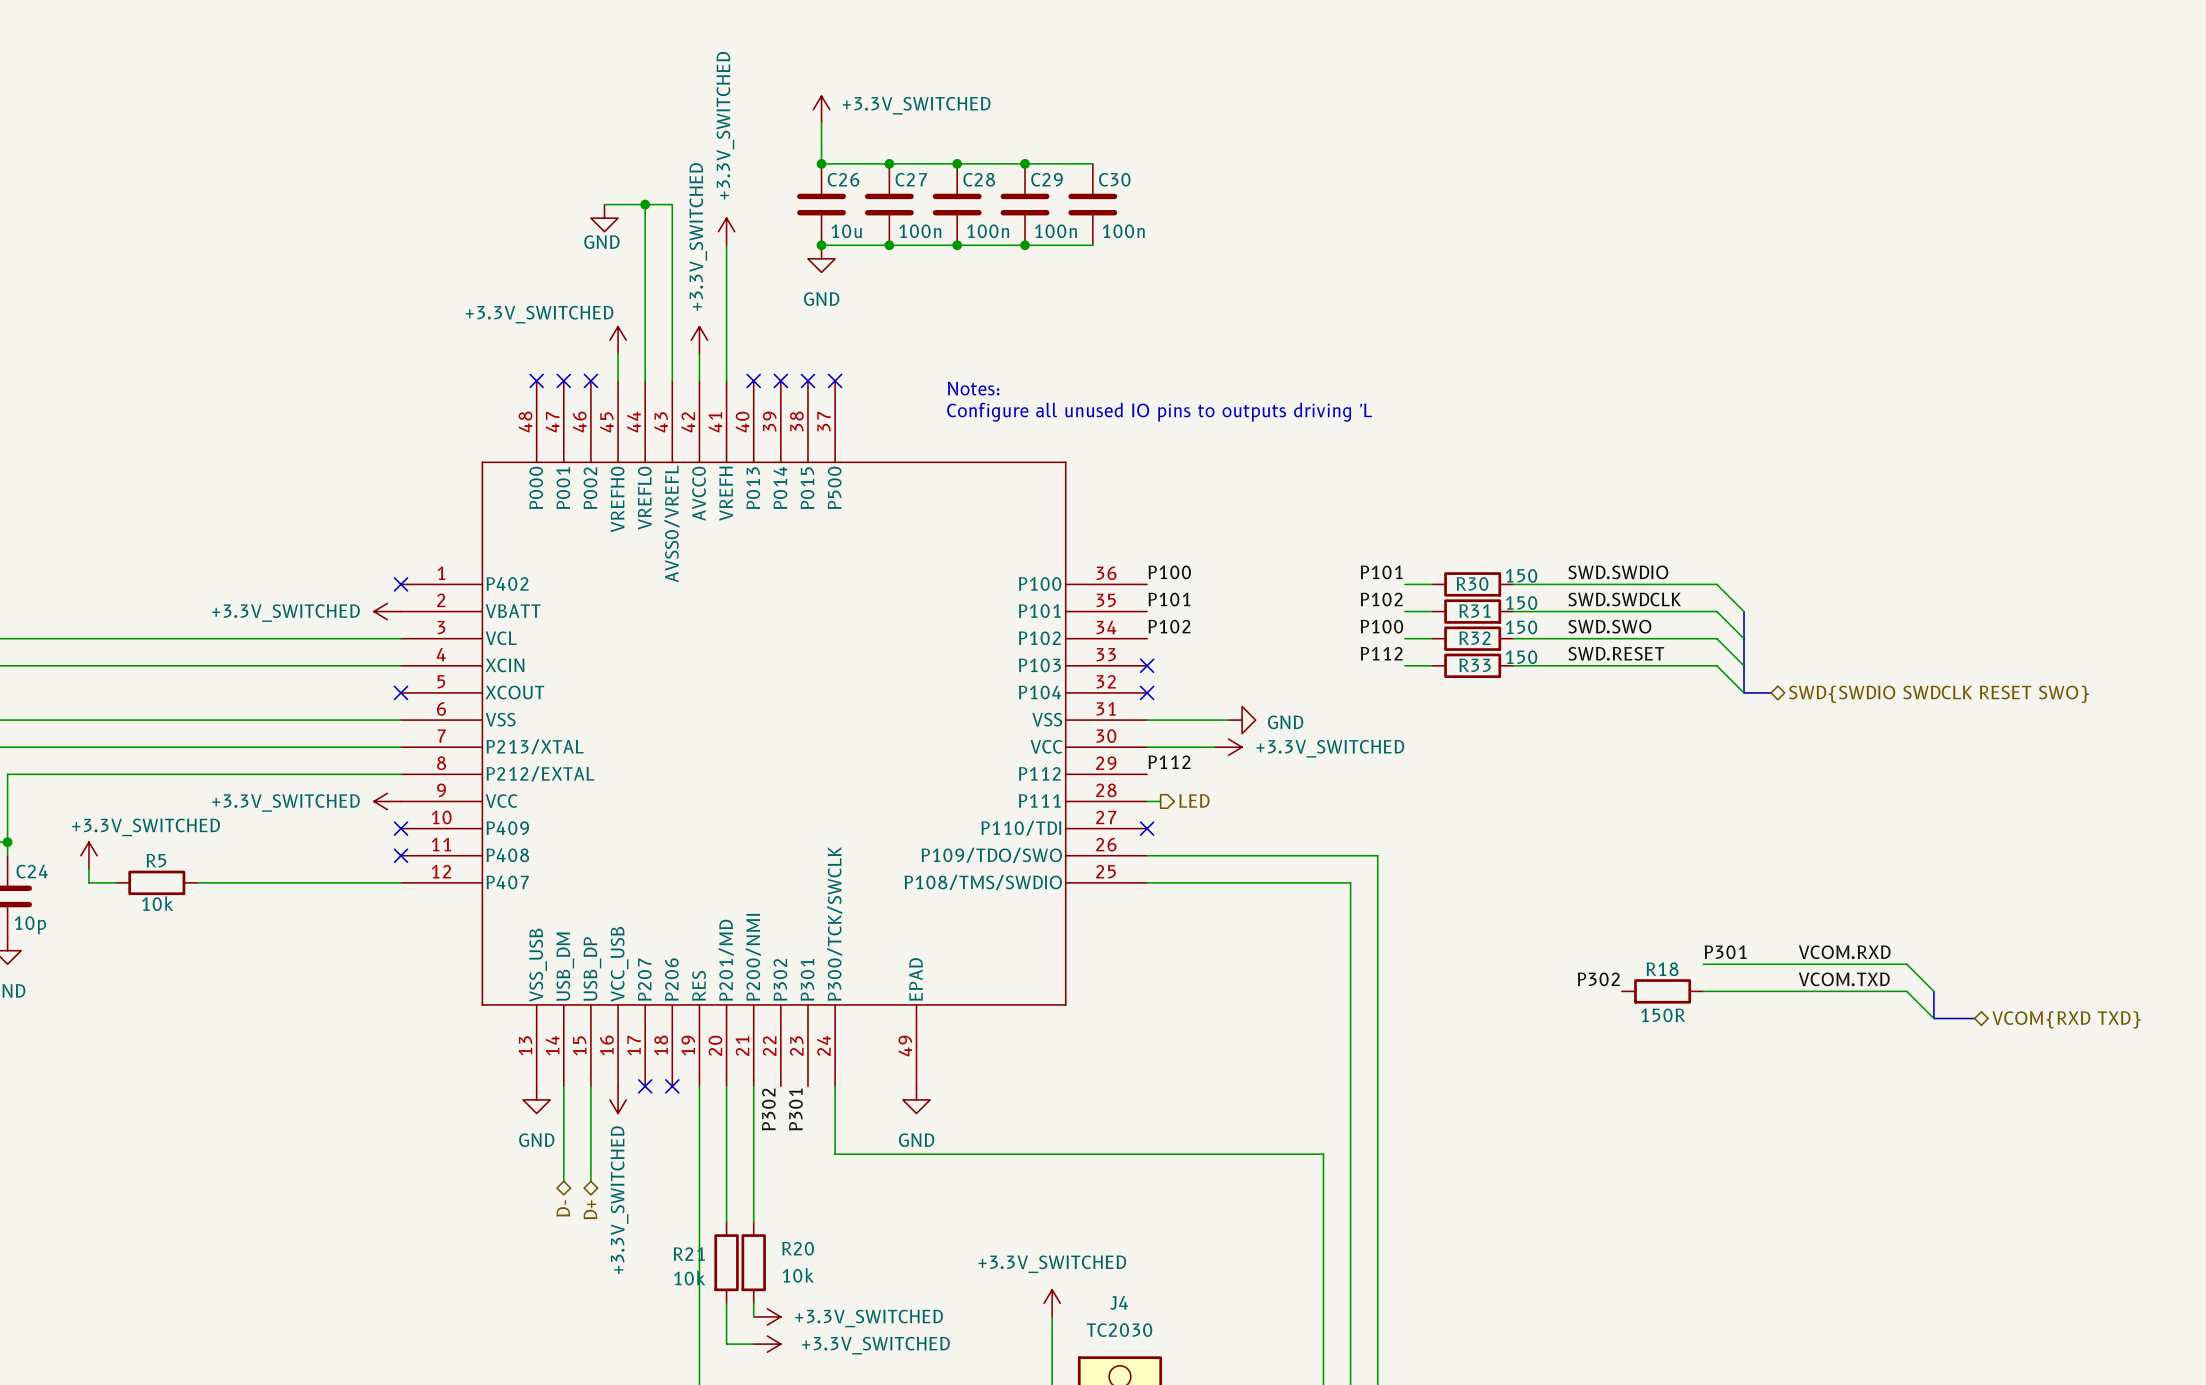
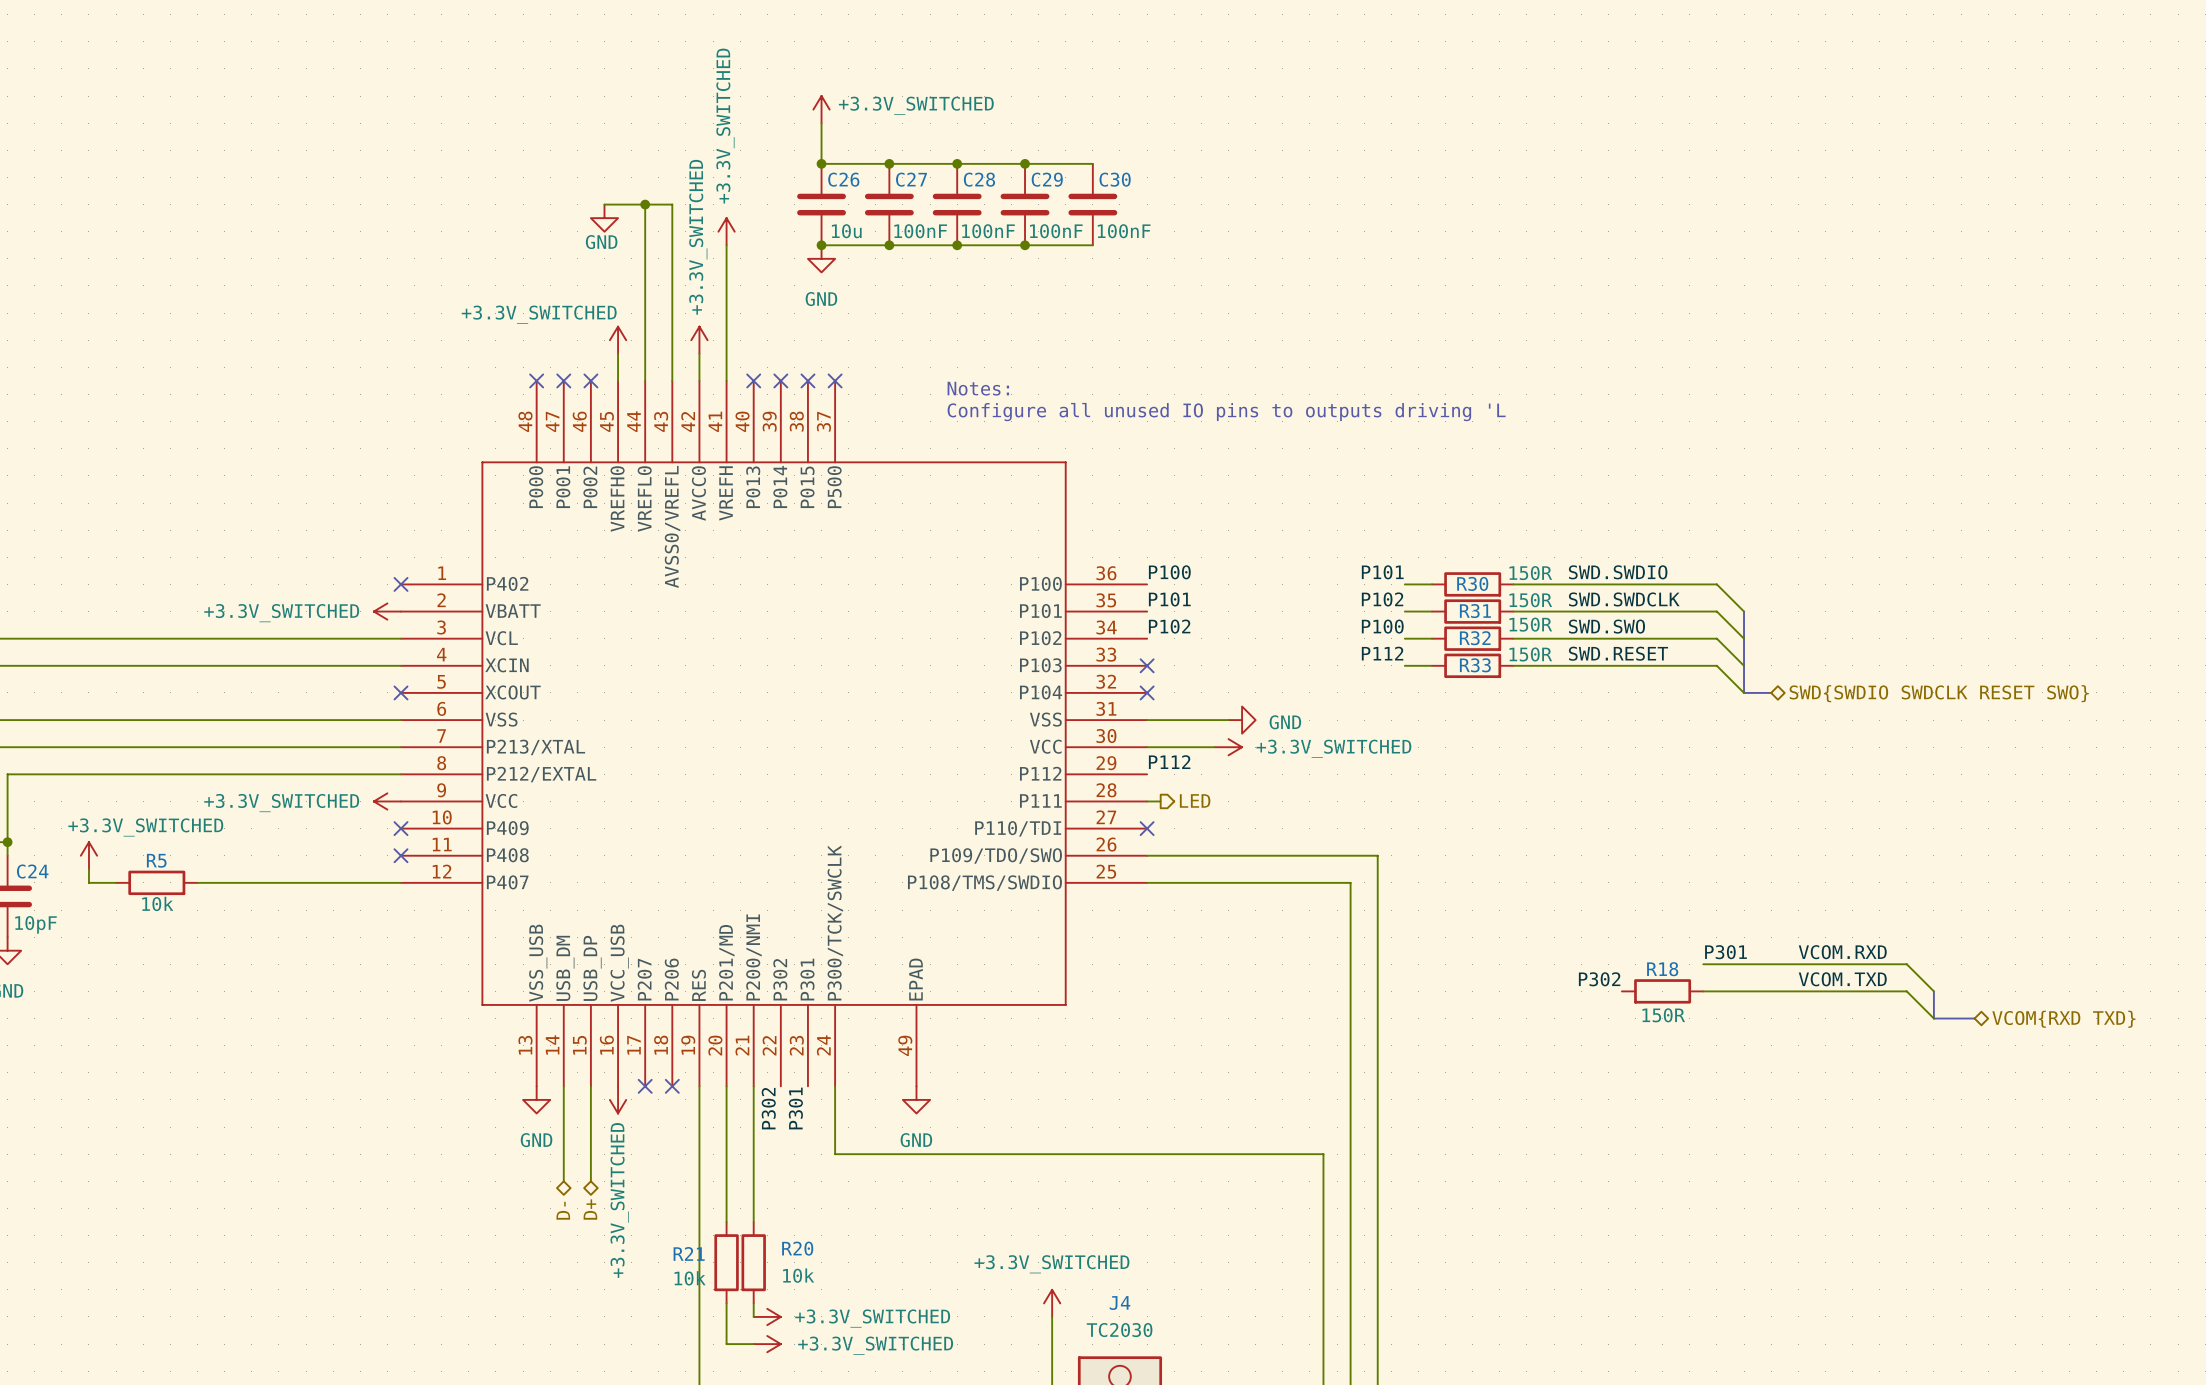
C27 value: 100n (920, 231) -> 100nF (920, 231)
C28 value: 100n (988, 231) -> 100nF (988, 231)
C29 value: 100n (1055, 231) -> 100nF (1056, 231)
C30 value: 100n (1123, 231) -> 100nF (1124, 231)
R30 value: 150 (1521, 575) -> 150R (1530, 573)
R31 value: 150 (1521, 602) -> 150R (1530, 600)
R32 value: 150 (1521, 627) -> 150R (1530, 624)
R33 value: 150 (1521, 657) -> 150R (1530, 654)
C24 value: 10p (30, 925) -> 10pF (35, 924)

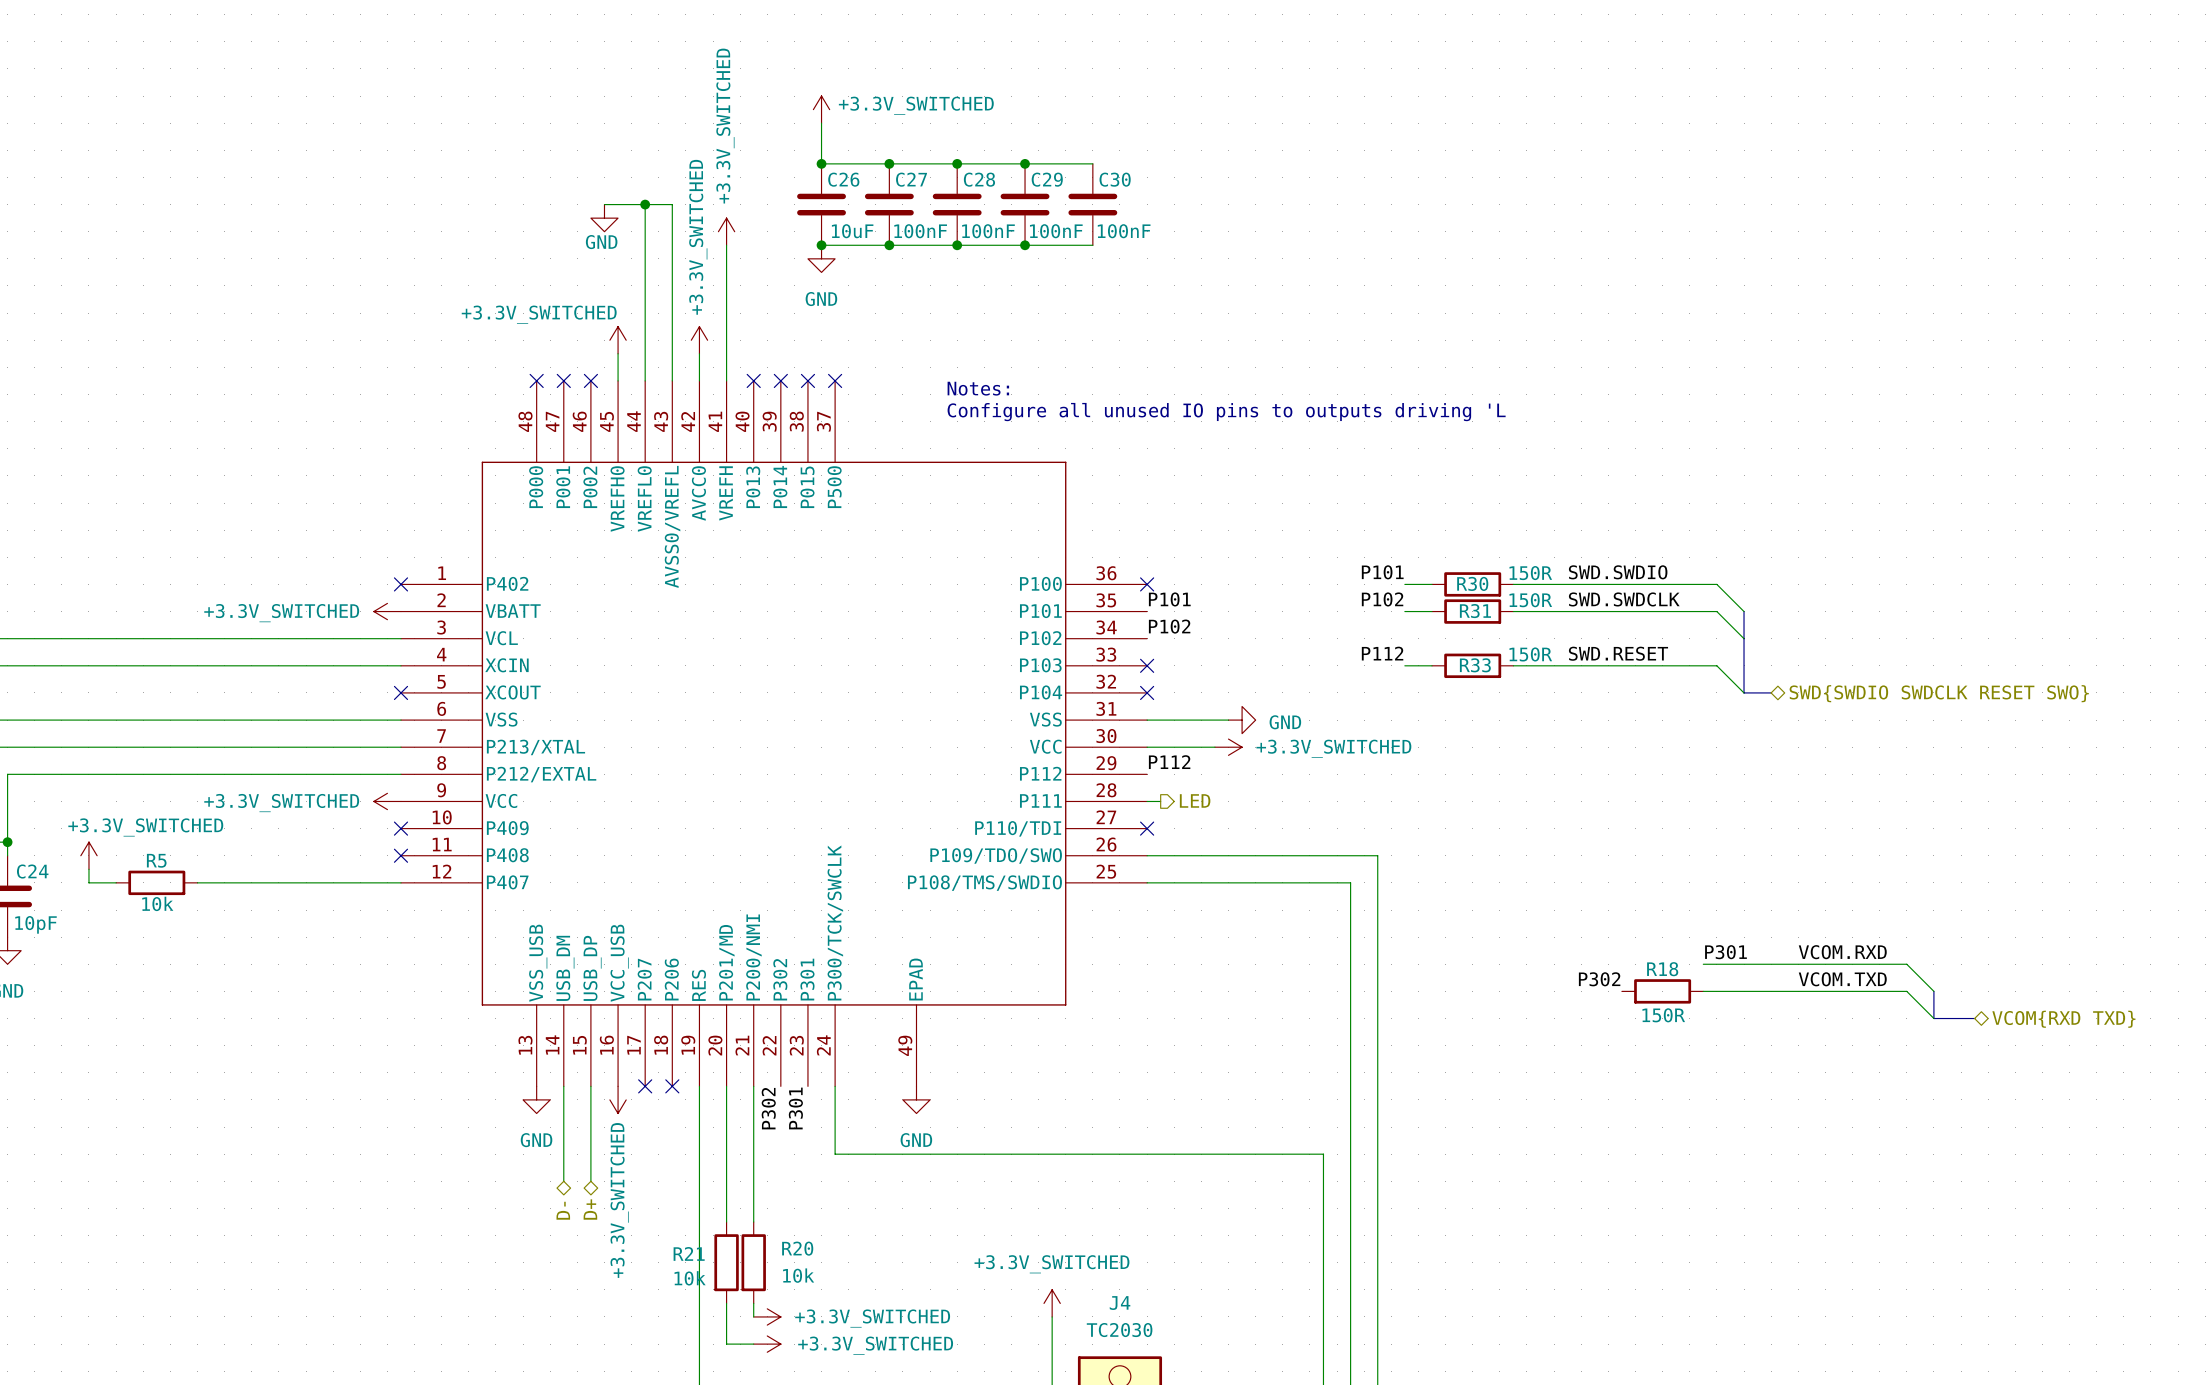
C26 value: 10u (846, 231) -> 10uF (852, 231)
label: P100 (1169, 572) -> none
no-connect mark: none -> (1147, 584)
label: P100 (1382, 626) -> none
label: SWD.SWO (1606, 626) -> none
wire: (1404, 638) (1431, 638) -> none
R32: 150R (1472, 638) -> none
wire: (1513, 638) (1716, 638) (1744, 665) -> none

